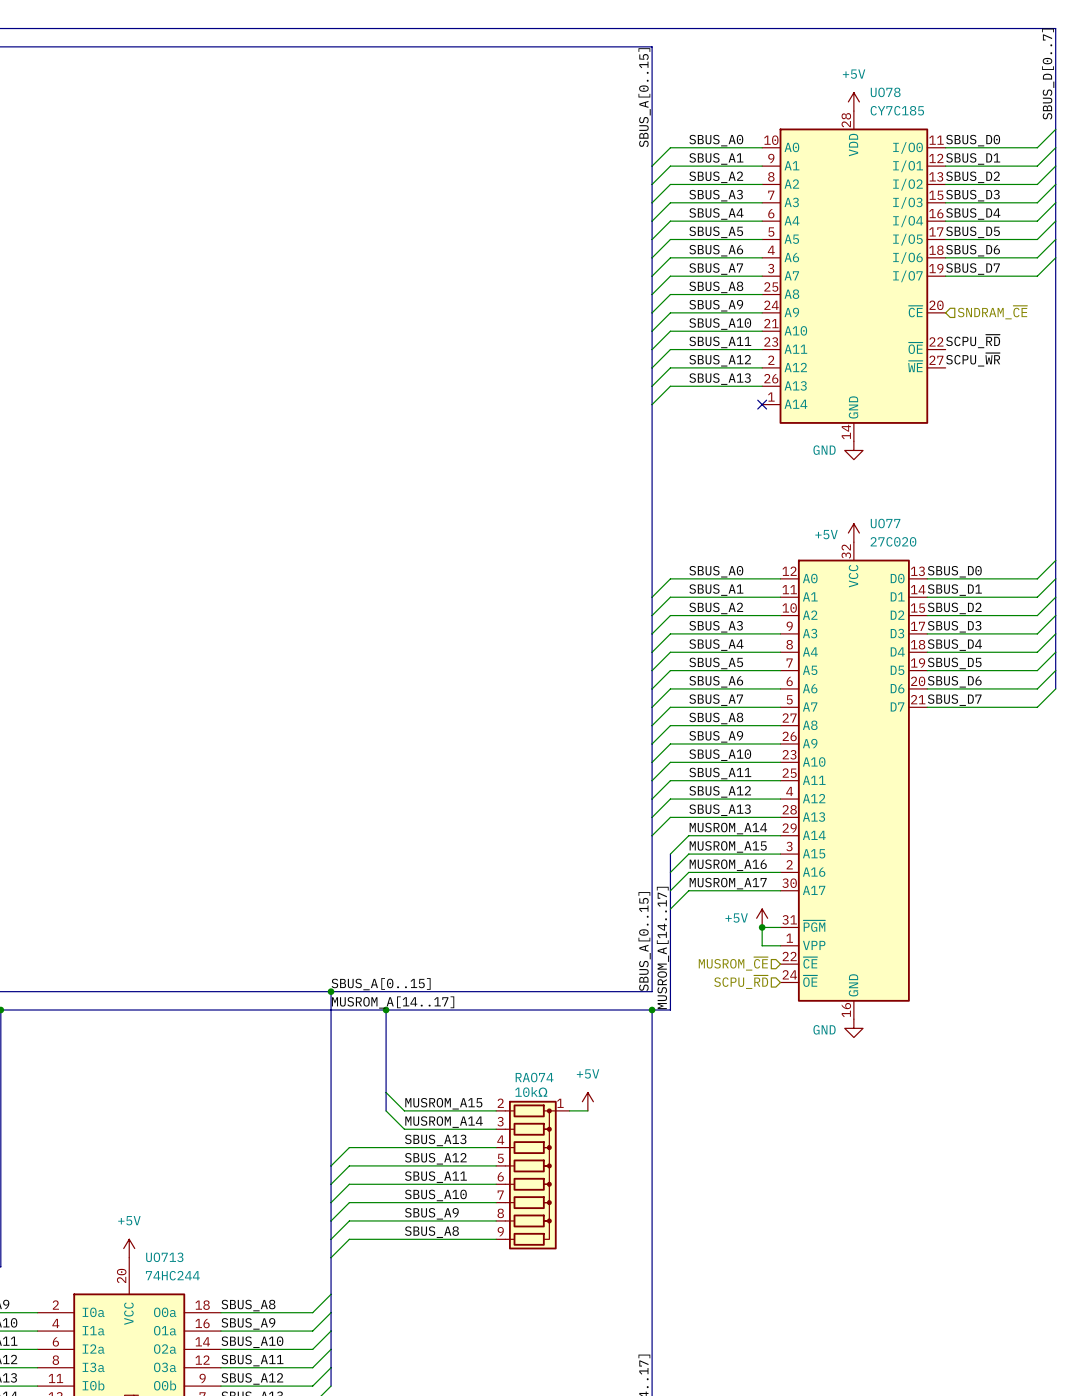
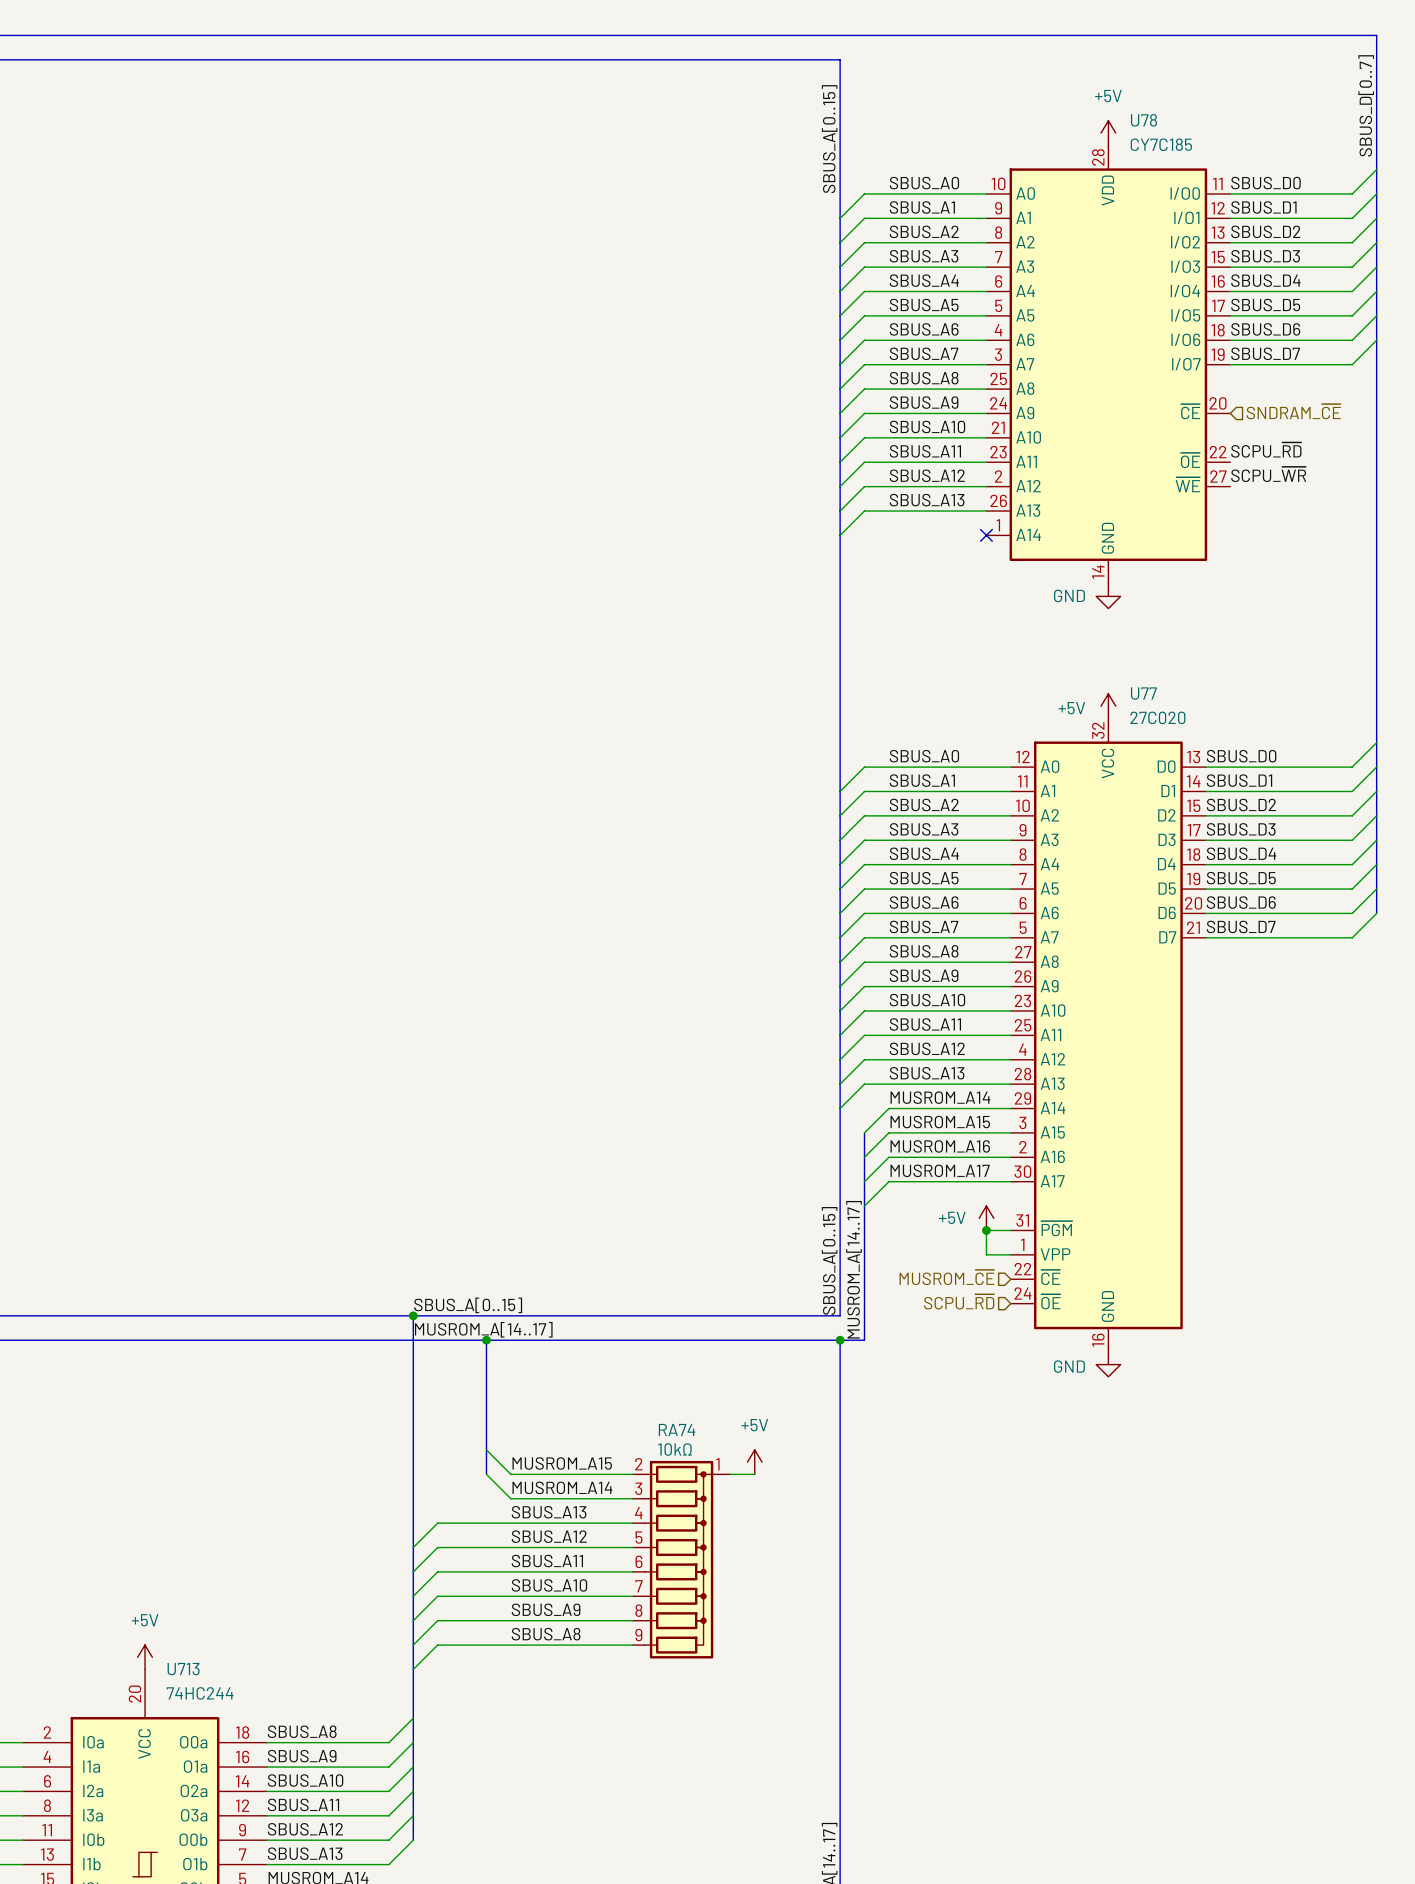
UO78 name: UO78 (885, 92) -> U78 (1143, 120)
UO77 name: UO77 (885, 523) -> U77 (1143, 693)
RAO74 name: RAO74 (534, 1077) -> RA74 (677, 1430)
UO713 name: UO713 (164, 1257) -> U713 (183, 1669)

